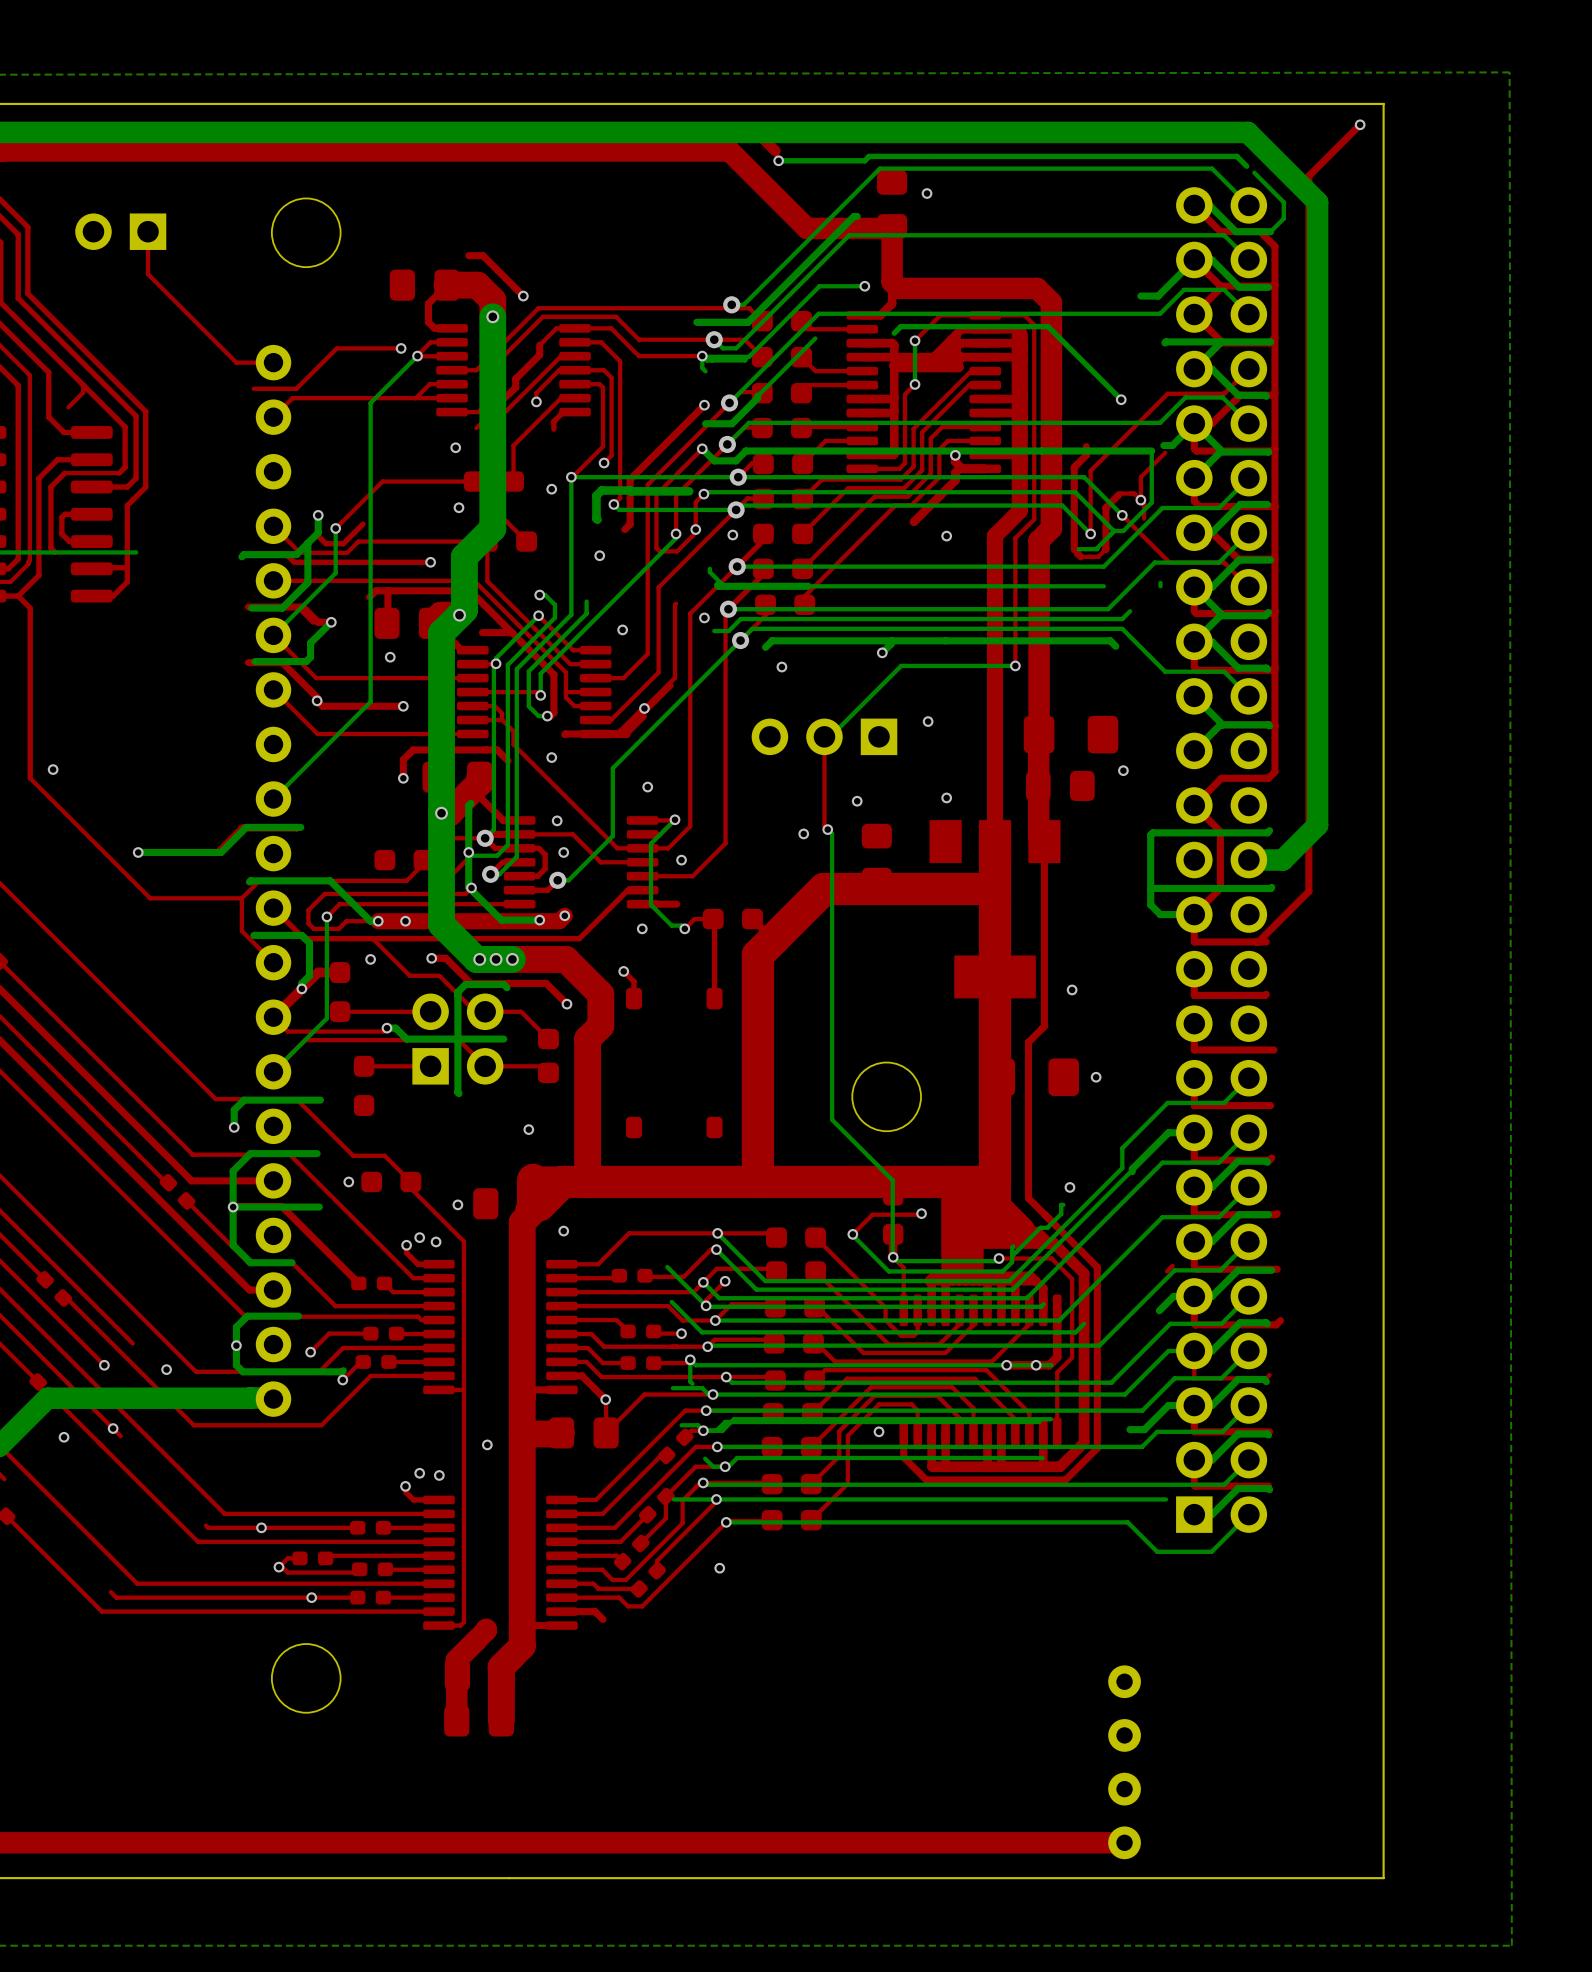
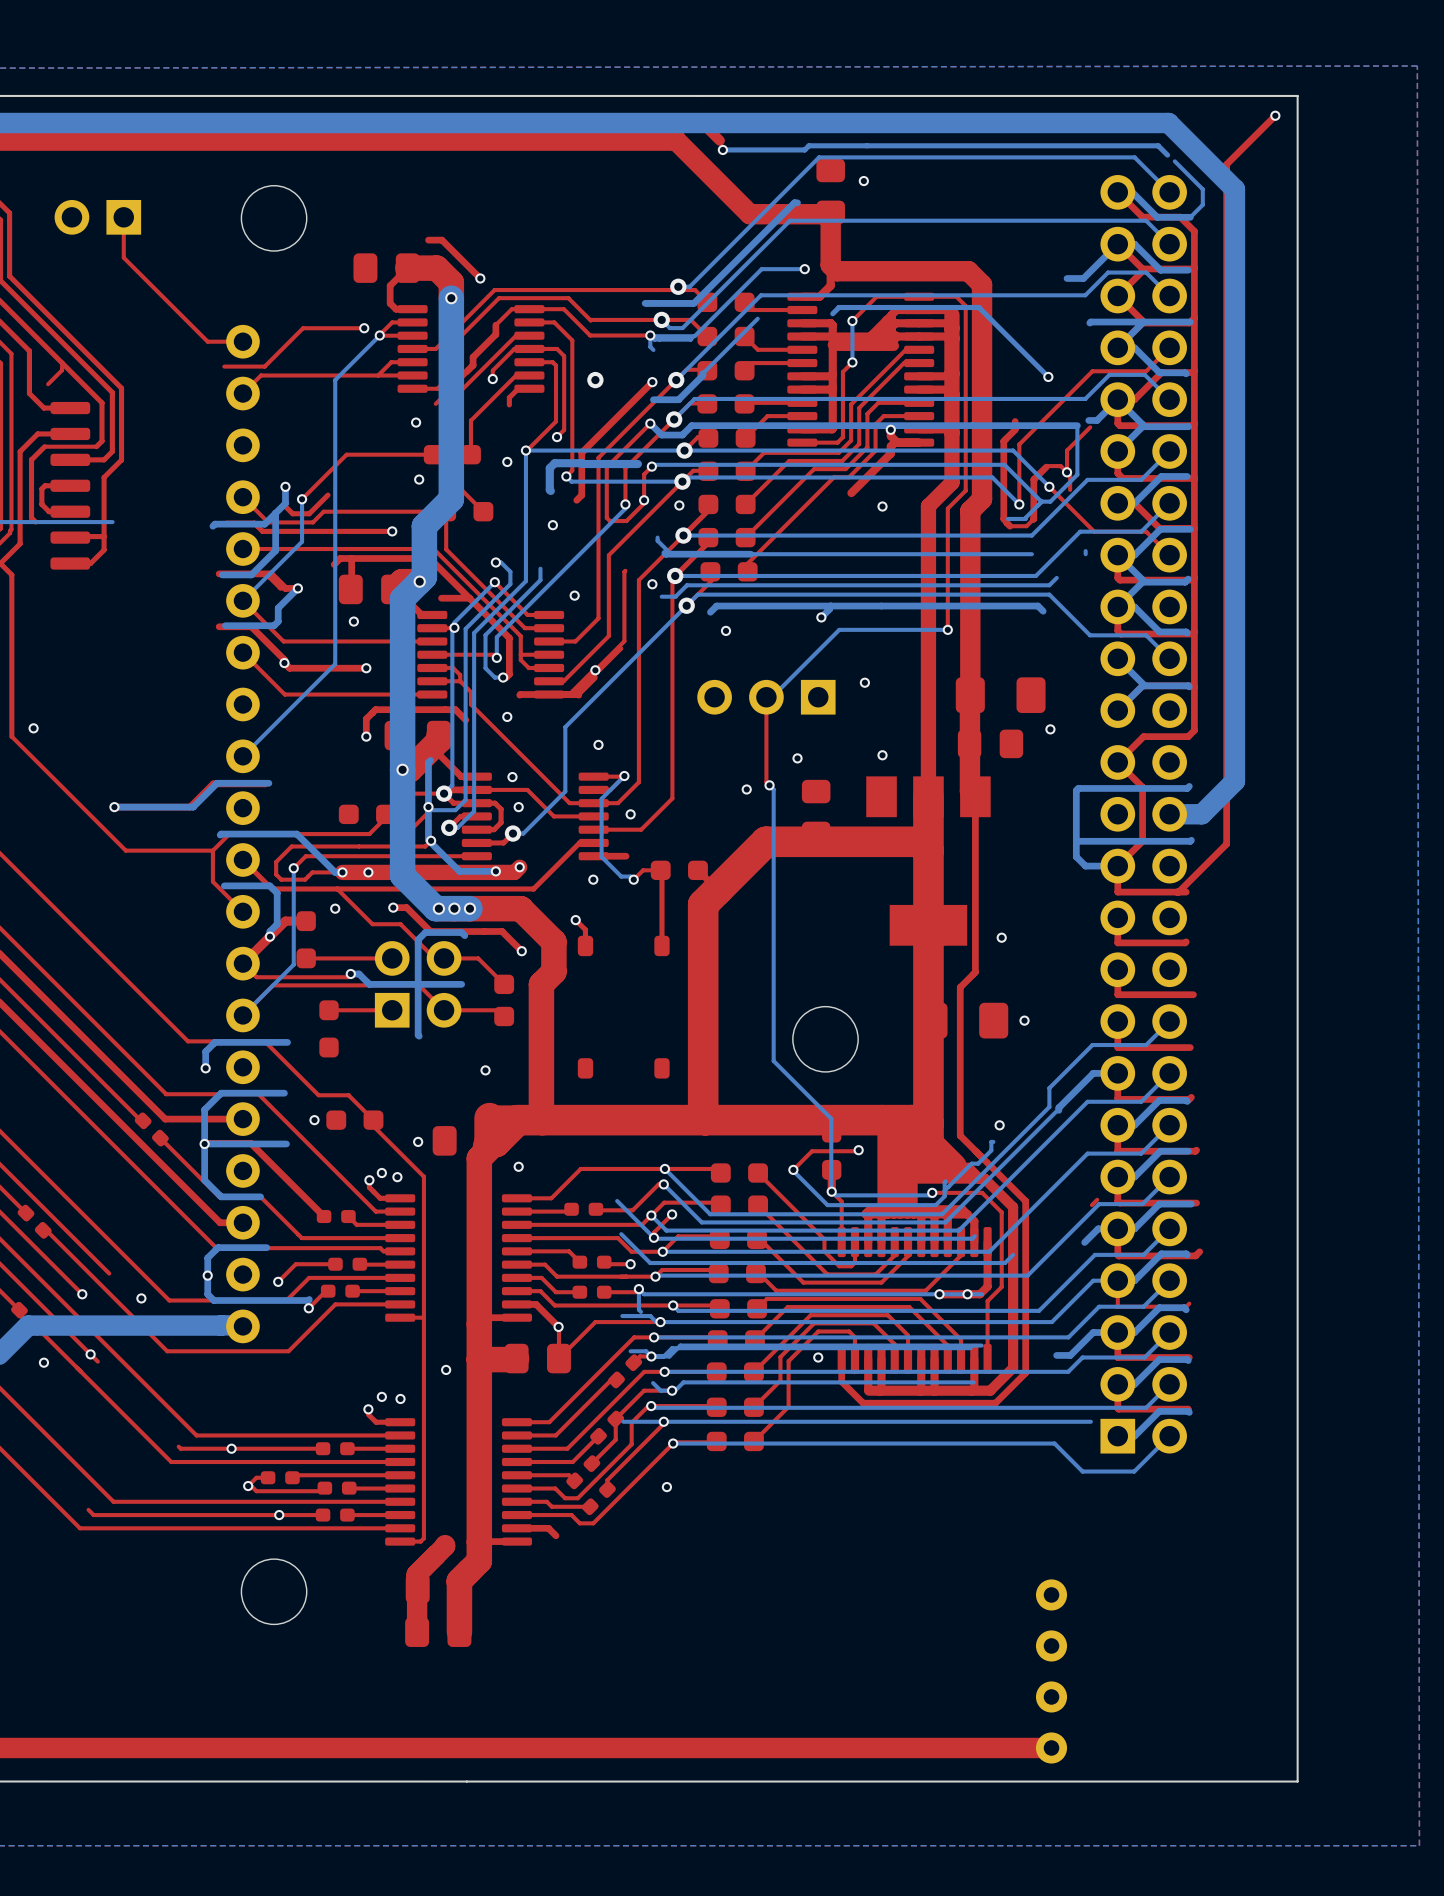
via: none -> (595, 380)

